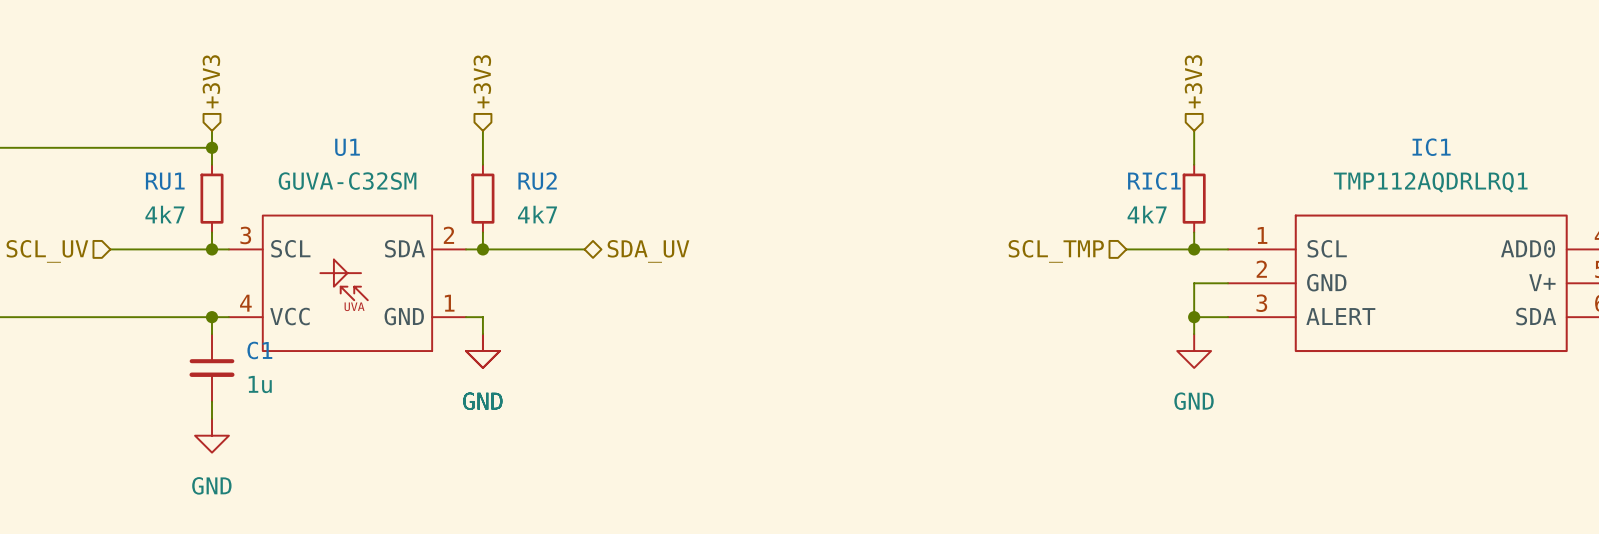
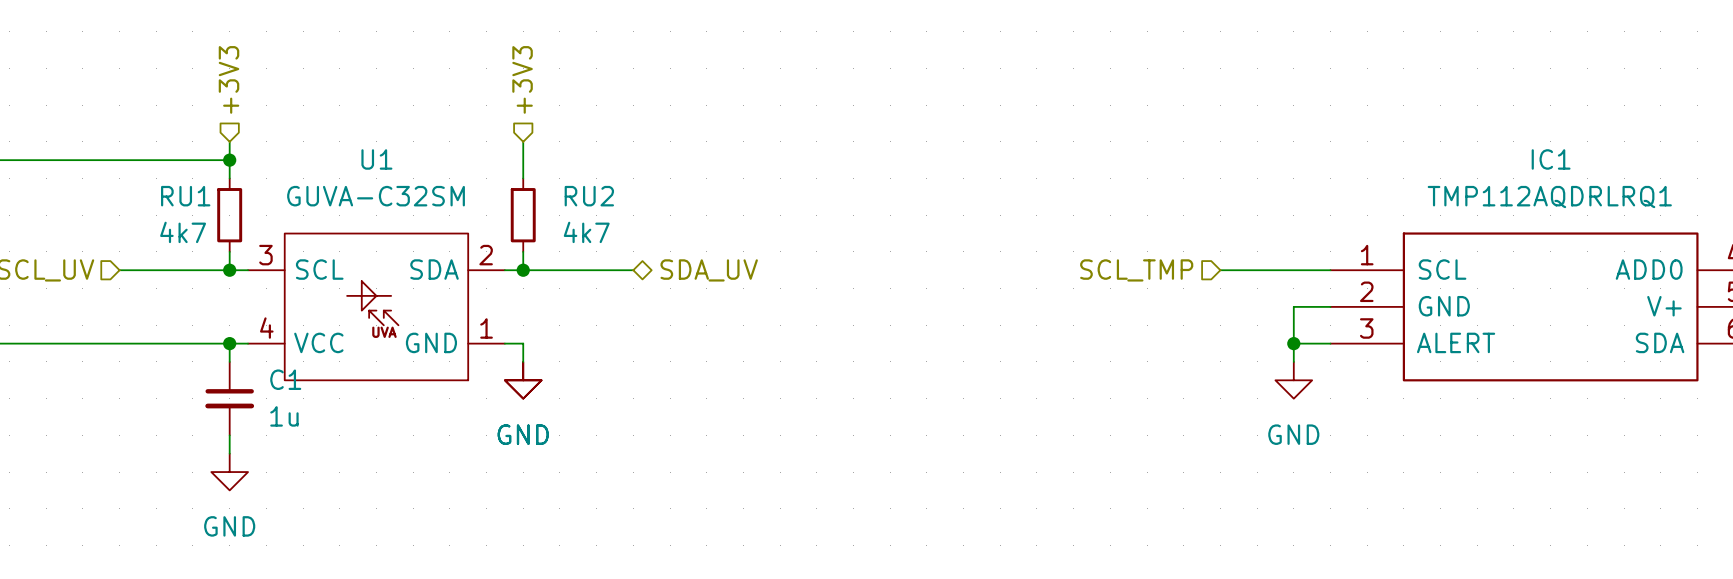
hierarchical label: +3V3 (1193, 81) -> none
wire: (1194, 130) (1194, 164) -> none
RIC1: 4k7 (1194, 198) -> none
wire: (1194, 232) (1194, 249) -> none
junction: (1194, 249) -> none

